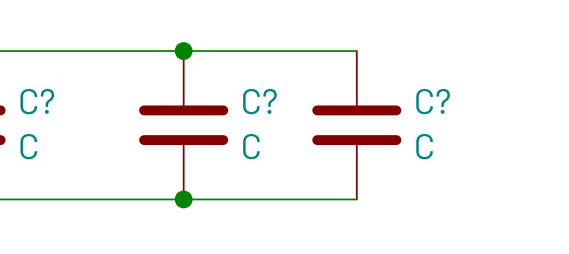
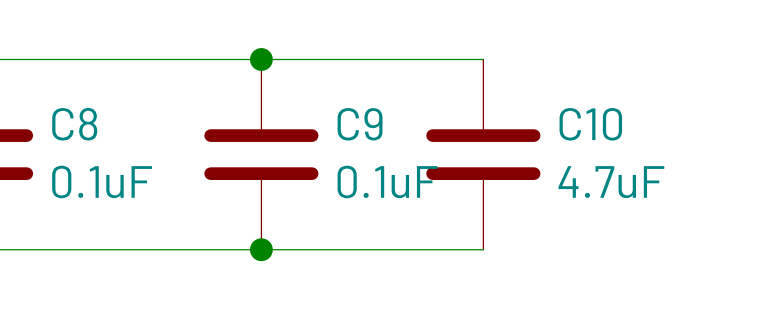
C? name: C? (37, 101) -> C8 (74, 124)
C? name: C? (259, 101) -> C9 (360, 124)
C? name: C? (433, 101) -> C10 (590, 124)
C? value: C (28, 146) -> 0.1uF (102, 181)
C? value: C (251, 146) -> 0.1uF (387, 181)
C? value: C (424, 146) -> 4.7uF (611, 182)

